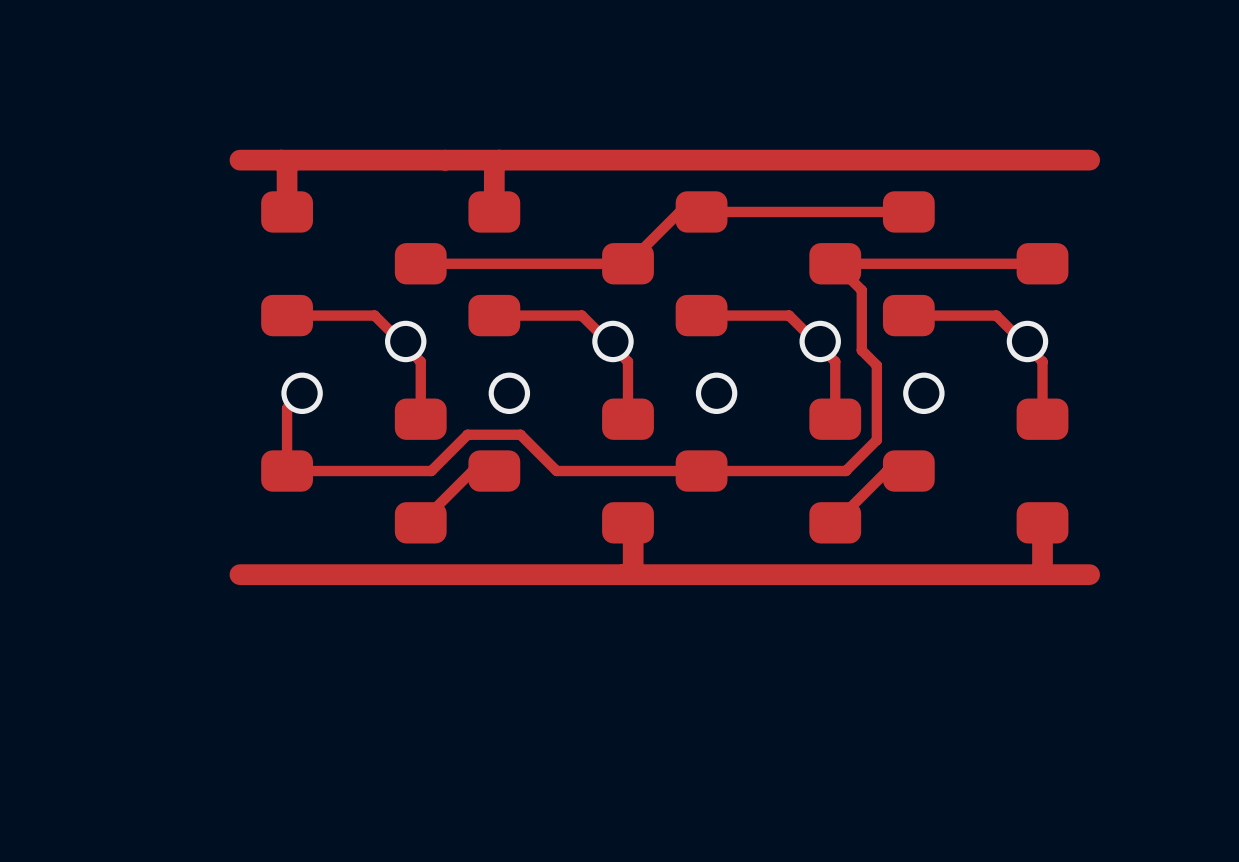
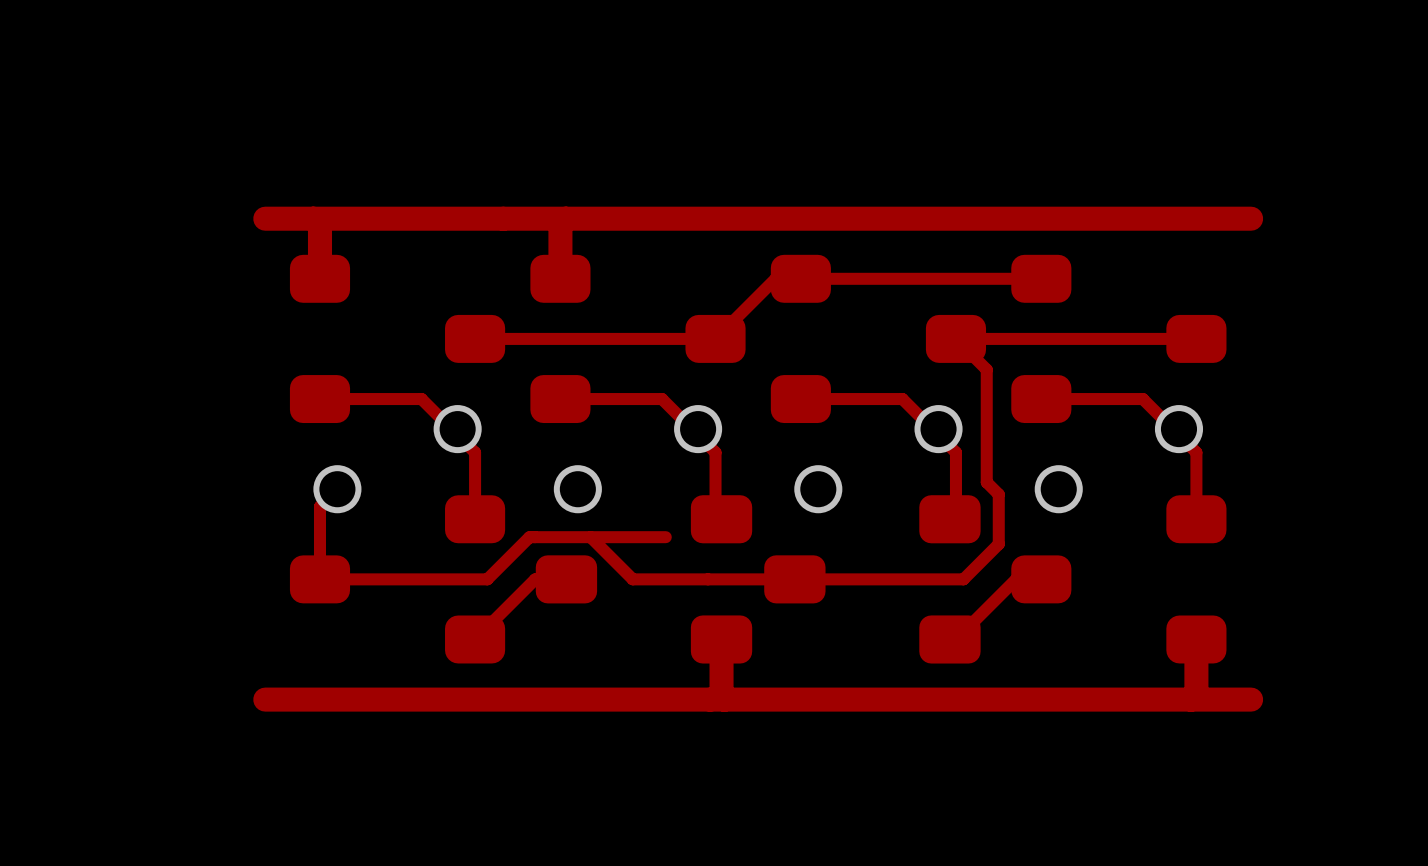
top track: (861, 350) (876, 365) (876, 440) (845, 471) (841, 471) -> (986, 439) (986, 482) (998, 494) (998, 544) (963, 579)
part footprint: [468, 398, 654, 544] -> [535, 495, 753, 664]
part footprint: [675, 398, 862, 544] -> [764, 495, 981, 664]

